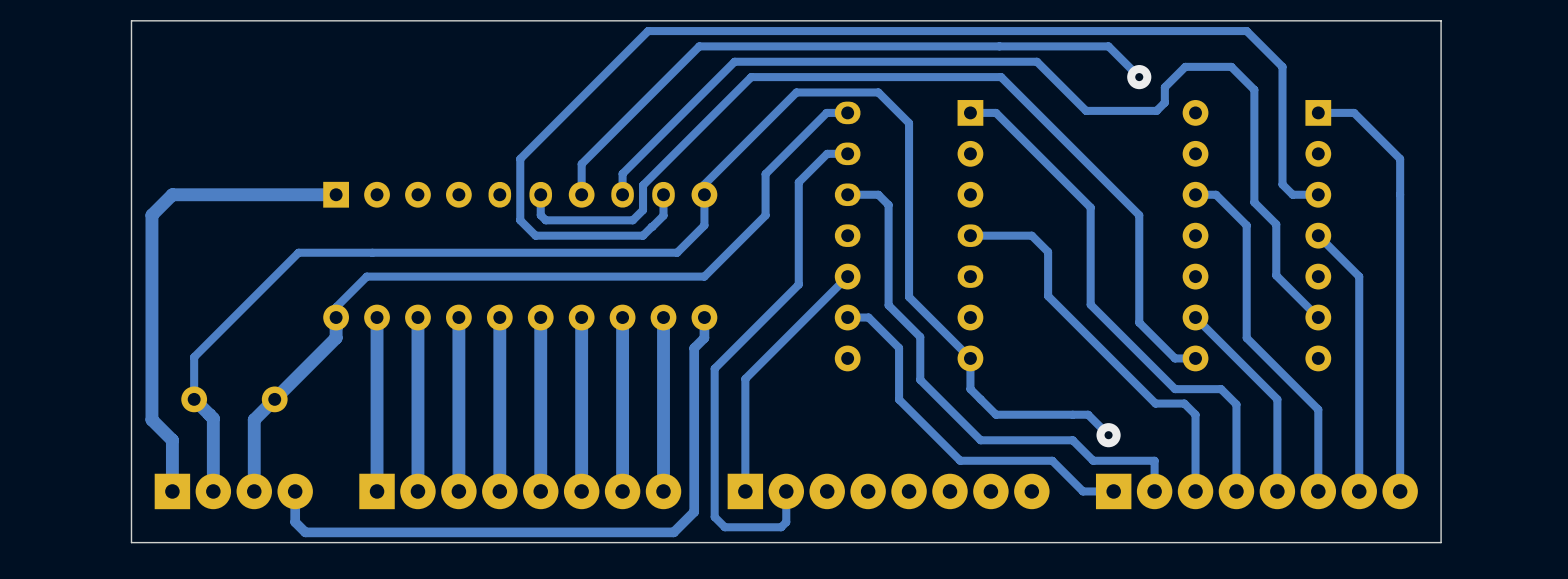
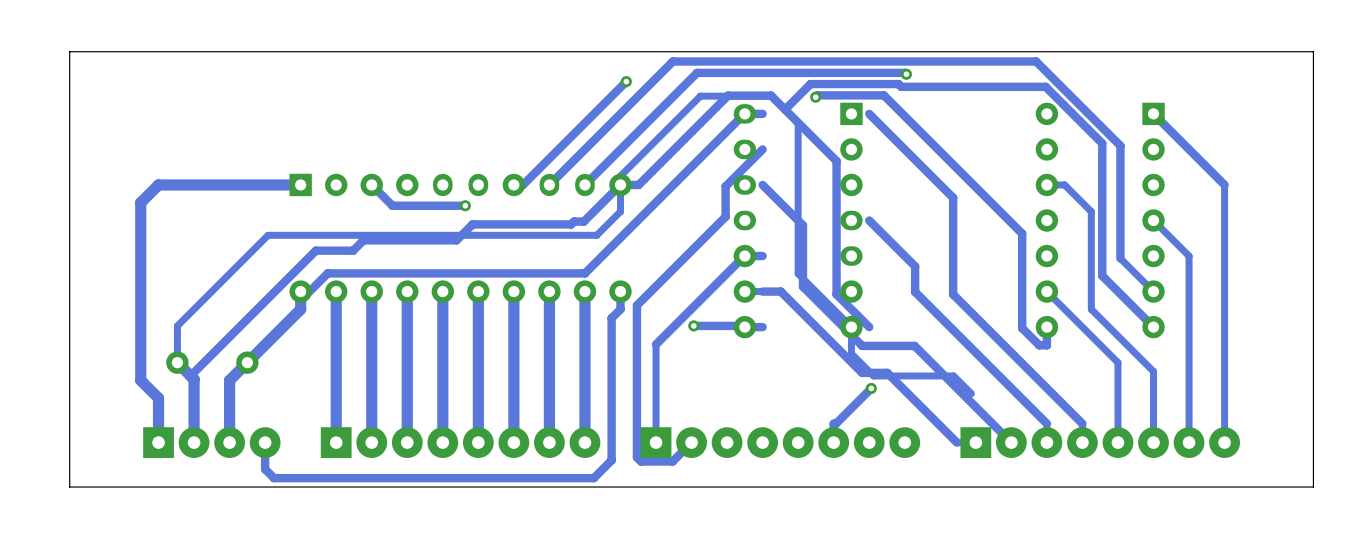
via: none -> (906, 74)
via: none -> (626, 81)
track: (1139, 77) (1108, 46) (699, 46) (581, 164) (581, 194) -> (626, 81) (522, 184) (513, 184)
via: (1139, 77) -> none
via: none -> (815, 97)
track: none -> (785, 109) (810, 84) (898, 84) (901, 86) (1045, 86) (1102, 143) (1102, 275) (1153, 327)
track: (847, 112) (826, 112) (765, 174) (765, 215) (704, 276) (366, 276) (336, 307) (336, 317) -> none
track: none -> (762, 113) (744, 113) (584, 273) (327, 273) (300, 300)
track: (970, 112) (996, 112) (1090, 207) (1090, 304) (1175, 389) (1221, 389) (1236, 404) (1236, 469) -> (869, 113) (953, 197) (953, 294) (1082, 423)
track: (1318, 112) (1354, 112) (1400, 158) (1400, 194) -> (1153, 113) (1224, 184)
track: (847, 153) (827, 153) (798, 182) (798, 284) (714, 368) (714, 517) (724, 527) (781, 527) (786, 522) (786, 491) -> (762, 149) (725, 186) (725, 216) (636, 305) (636, 457) (641, 461) (672, 461) (691, 442)
track: none -> (371, 184) (392, 205) (465, 205)
track: (540, 194) (540, 215) (545, 220) (632, 220) (643, 210) (643, 185) (751, 77) (1001, 77) (1139, 215) (1139, 322) (1175, 358) (1195, 358) -> (815, 97) (817, 95) (883, 95) (1022, 233) (1022, 328) (1039, 345) (1046, 345) (1046, 327)
track: (622, 194) (622, 173) (734, 61) (1036, 61) (1086, 110) (1156, 110) (1164, 102) (1164, 87) (1185, 66) (1231, 66) (1254, 89) (1254, 202) (1276, 224) (1276, 275) (1280, 279) -> (549, 184) (672, 61) (1036, 61) (1120, 145) (1120, 258)
track: (847, 194) (878, 194) (888, 204) (888, 305) (920, 337) (920, 379) (980, 440) (1072, 440) (1093, 460) (1154, 460) (1154, 491) -> (762, 184) (802, 225) (802, 286) (862, 345) (914, 345) (1011, 442)
track: (1318, 194) (1292, 194) (1282, 184) (1282, 66) (1246, 31) (648, 31) (520, 158) (520, 220) (535, 235) (643, 235) (663, 215) (663, 194) -> (906, 74) (697, 72) (584, 184)
via: none -> (465, 205)
track: (970, 235) (1031, 235) (1048, 251) (1048, 296) (1155, 403) (1184, 403) (1195, 414) (1195, 469) -> (869, 220) (915, 266) (915, 291) (1046, 423)
track: (847, 276) (745, 378) -> (762, 256) (744, 256) (656, 344)
track: (868, 317) (899, 347) (899, 399) (960, 460) (1052, 460) (1082, 491) (1091, 491) -> (762, 291) (780, 291) (862, 372) (887, 372) (956, 442)
track: none -> (693, 325) (762, 327)
via: none -> (693, 325)
track: none -> (869, 327) (836, 294) (836, 161) (771, 95) (728, 95) (638, 184) (620, 184) (583, 221) (574, 221) (571, 224) (472, 224) (456, 240) (363, 240) (353, 250) (315, 250) (190, 375)
track: none -> (871, 388) (836, 423) (833, 423) (833, 442)
via: none -> (871, 388)
via: (1108, 435) -> none
board edge: (1441, 542) (1441, 20) (131, 20) (131, 542) -> (1260, 487) (1313, 487) (1313, 51) (69, 51) (69, 487) (122, 487)

